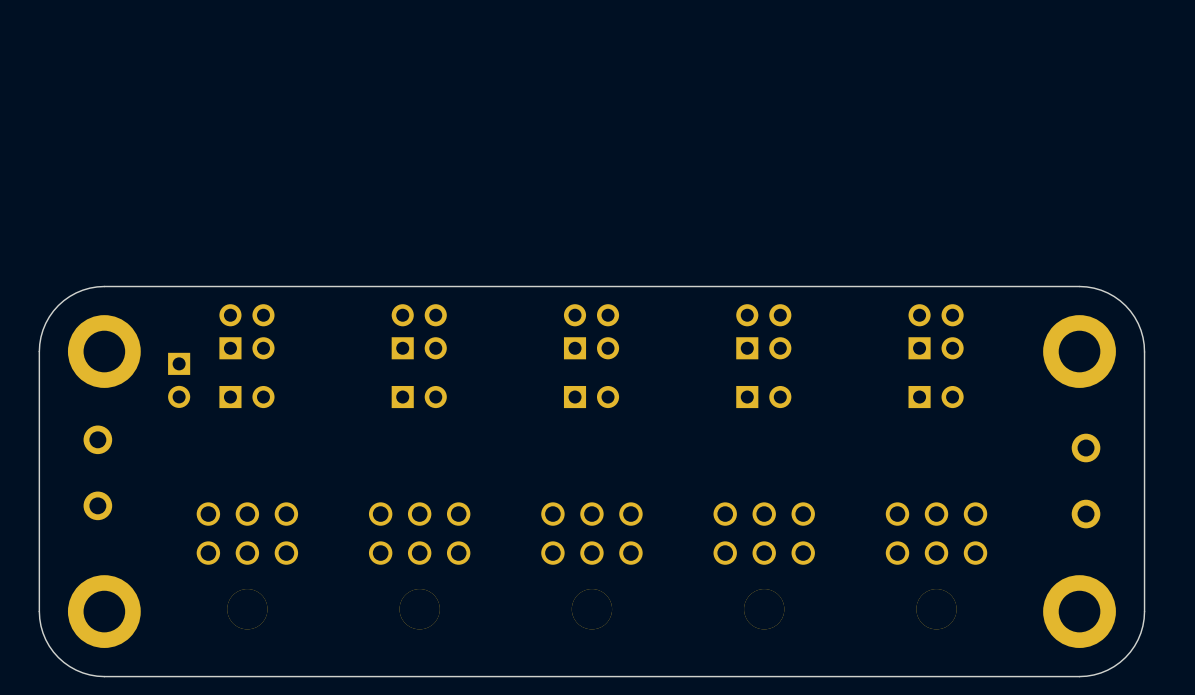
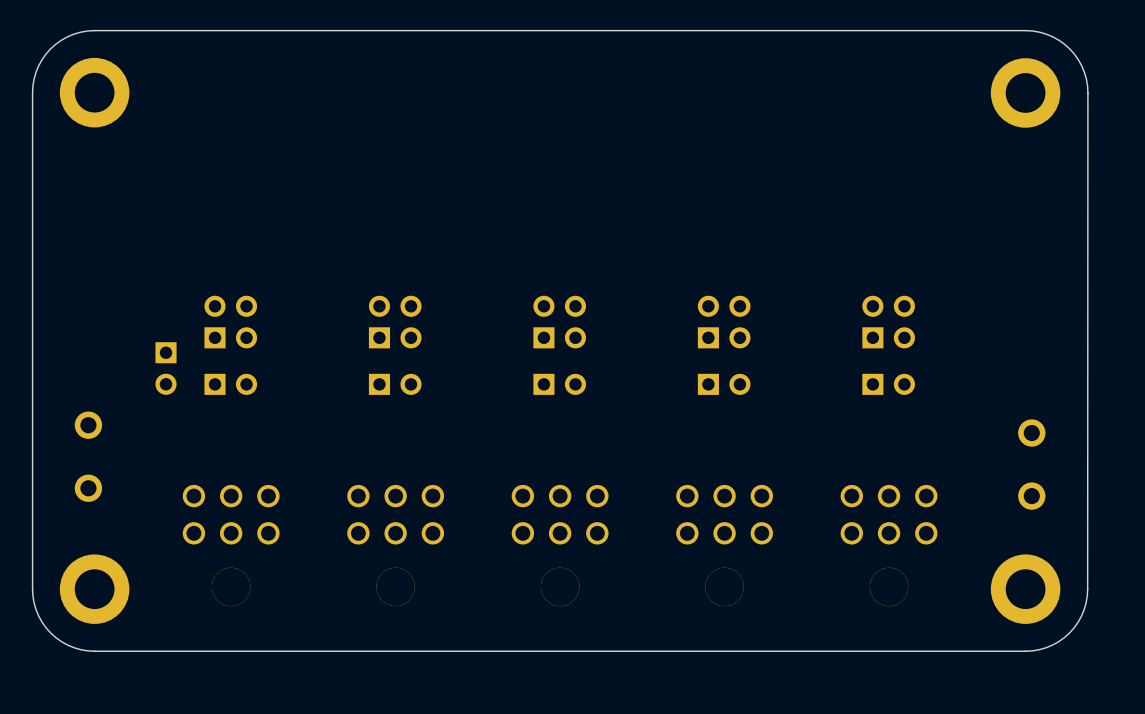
board edge: (39, 351) (43, 330) (53, 310) (69, 296) (82, 290) (97, 286) (1079, 286) (1094, 288) (1114, 296) (1130, 311) (1141, 330) (1144, 344) (1144, 611) -> (32, 340) (32, 85) (38, 65) (46, 53) (61, 40) (74, 34) (94, 30) (1025, 30) (1039, 32) (1058, 40) (1074, 54) (1084, 72) (1087, 86) (1087, 589)
part position: (104, 351) -> (94, 92)
part position: (1079, 351) -> (1025, 92)

